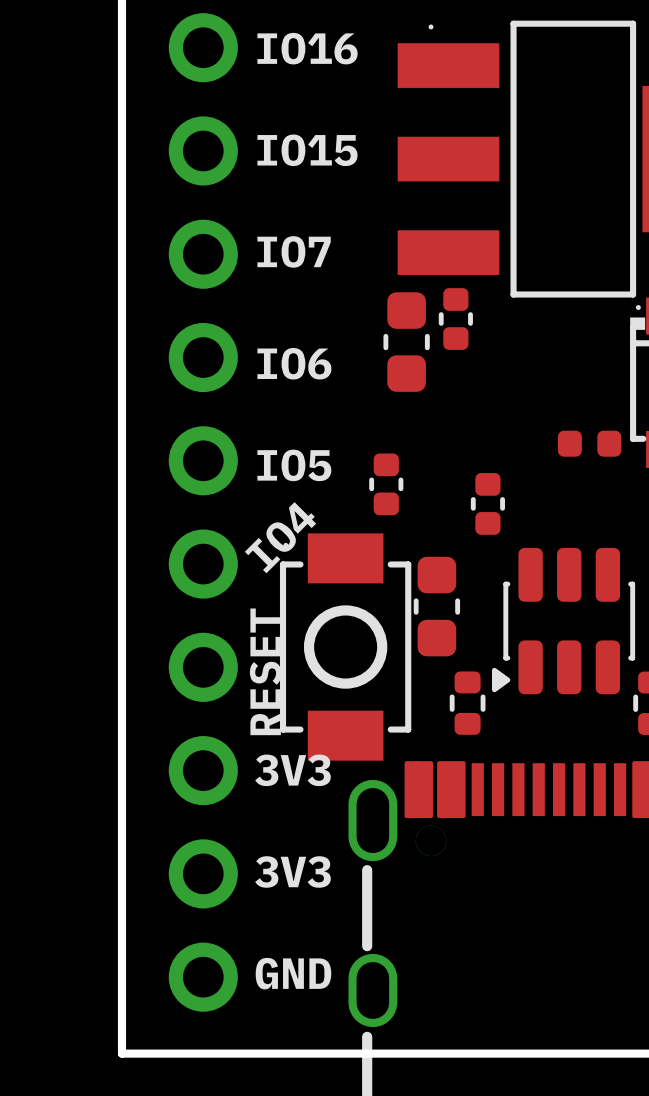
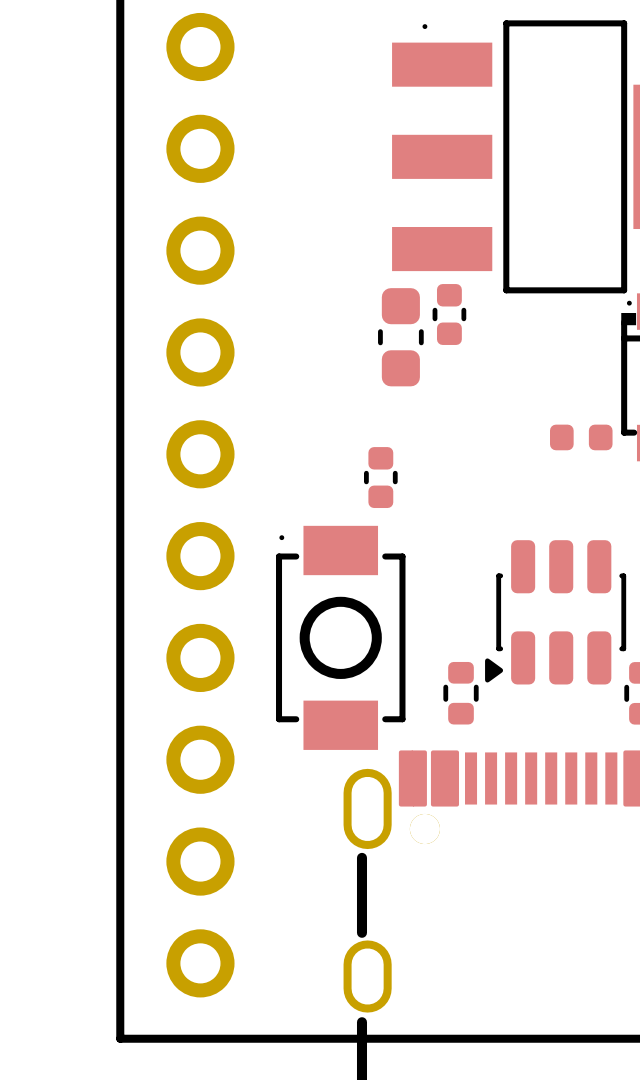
text: IO16 (307, 48) -> none
text: IO15 (307, 150) -> none
text: IO7 (294, 251) -> none
text: IO6 (294, 363) -> none
text: IO5 (294, 465) -> none
part: (487, 503) -> none
text: IO4 (280, 537) -> none
part: (436, 606) -> none
text: RESET (265, 671) -> none
text: 3V3 (293, 770) -> none
text: 3V3 (293, 871) -> none
text: GND (293, 973) -> none

